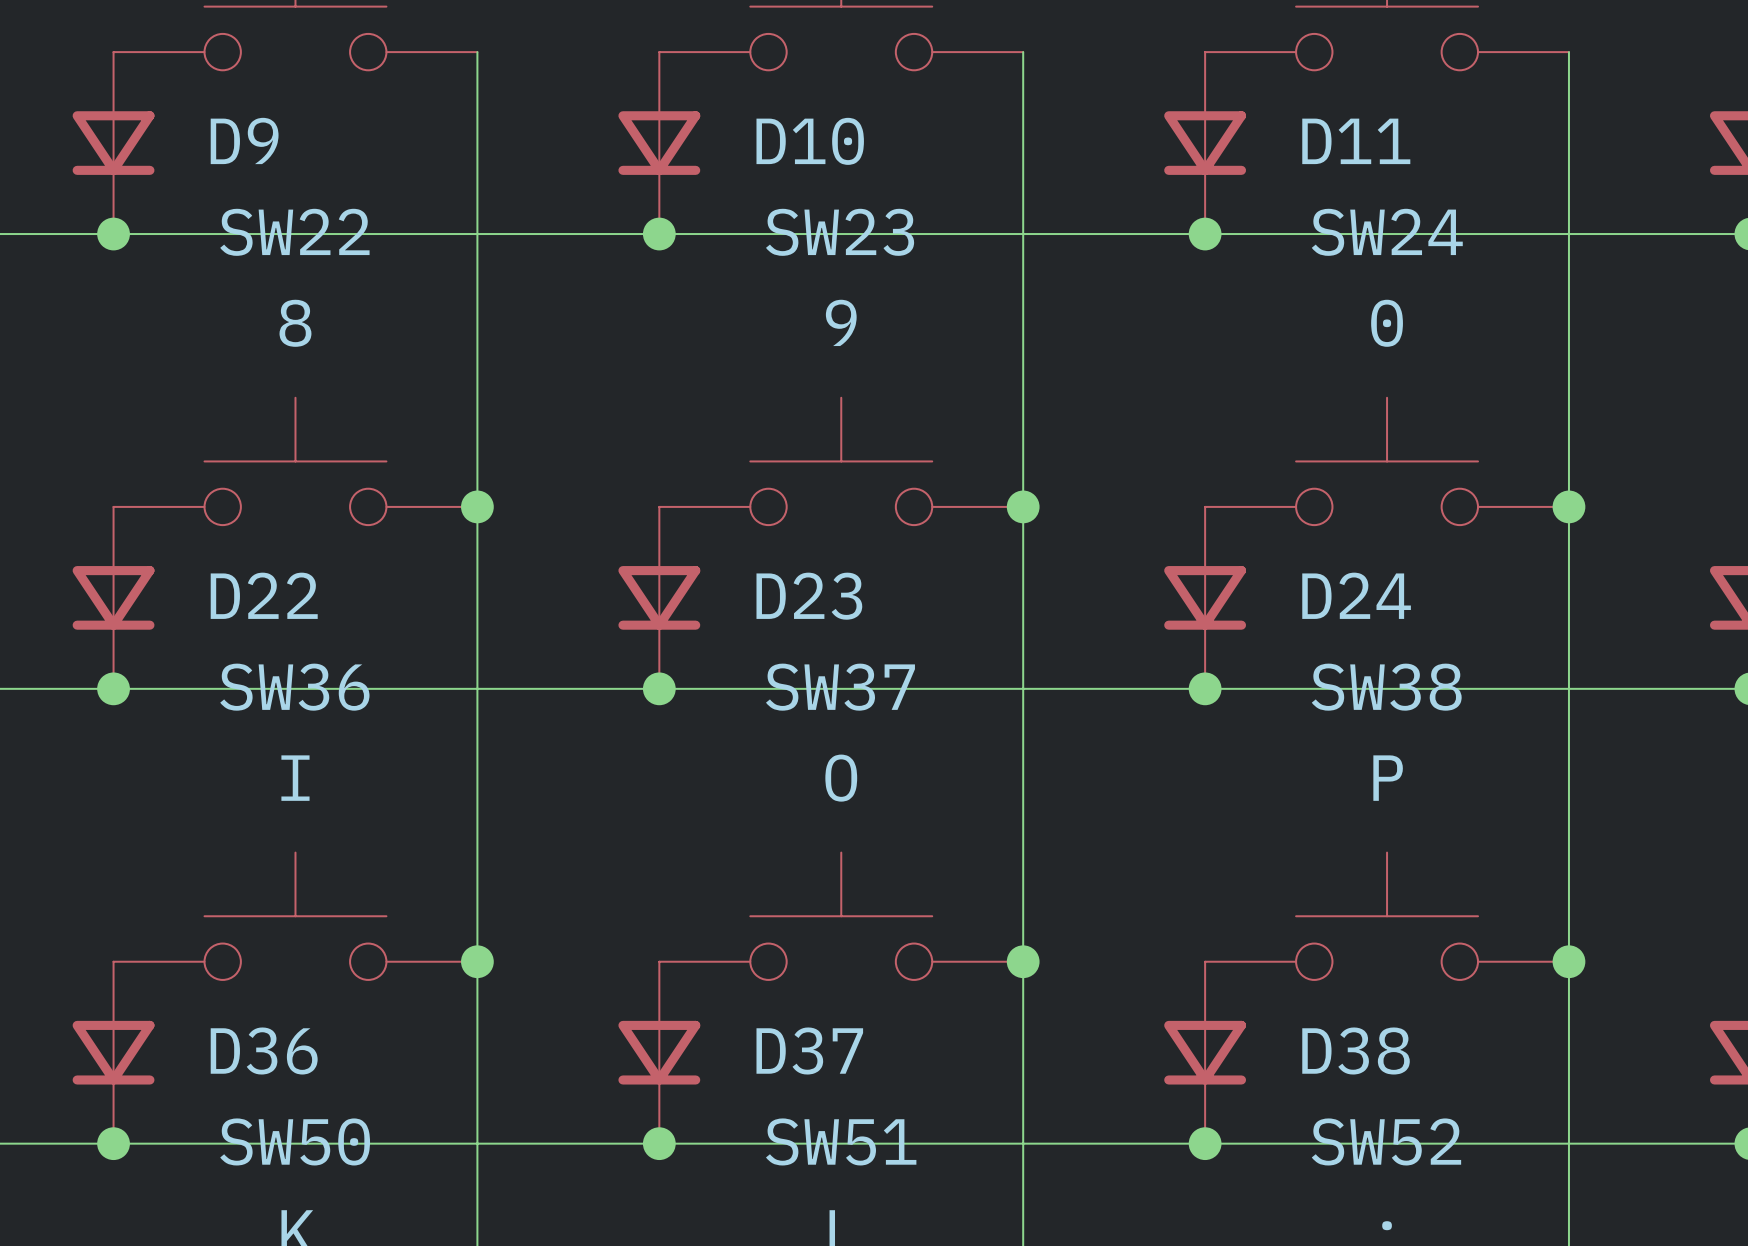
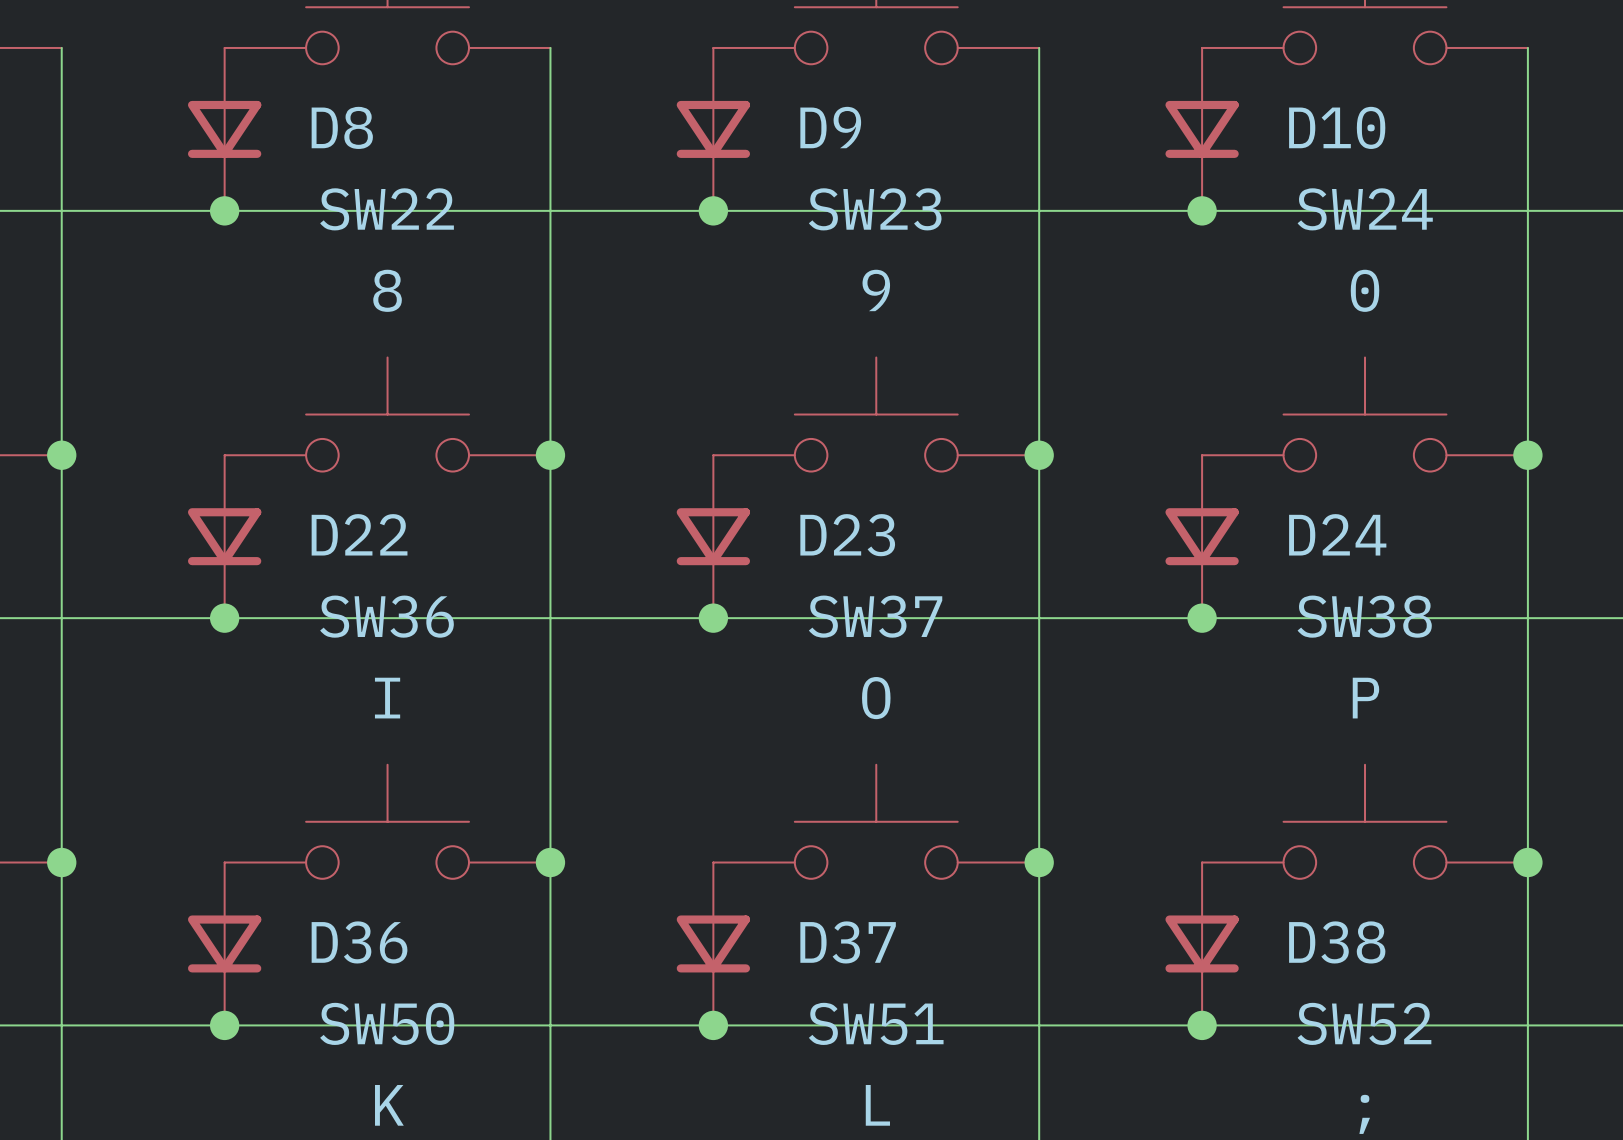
D9 name: D9 (244, 140) -> D8 (342, 127)
D10 name: D10 (810, 141) -> D9 (830, 127)
D11 name: D11 (1356, 141) -> D10 (1337, 127)

